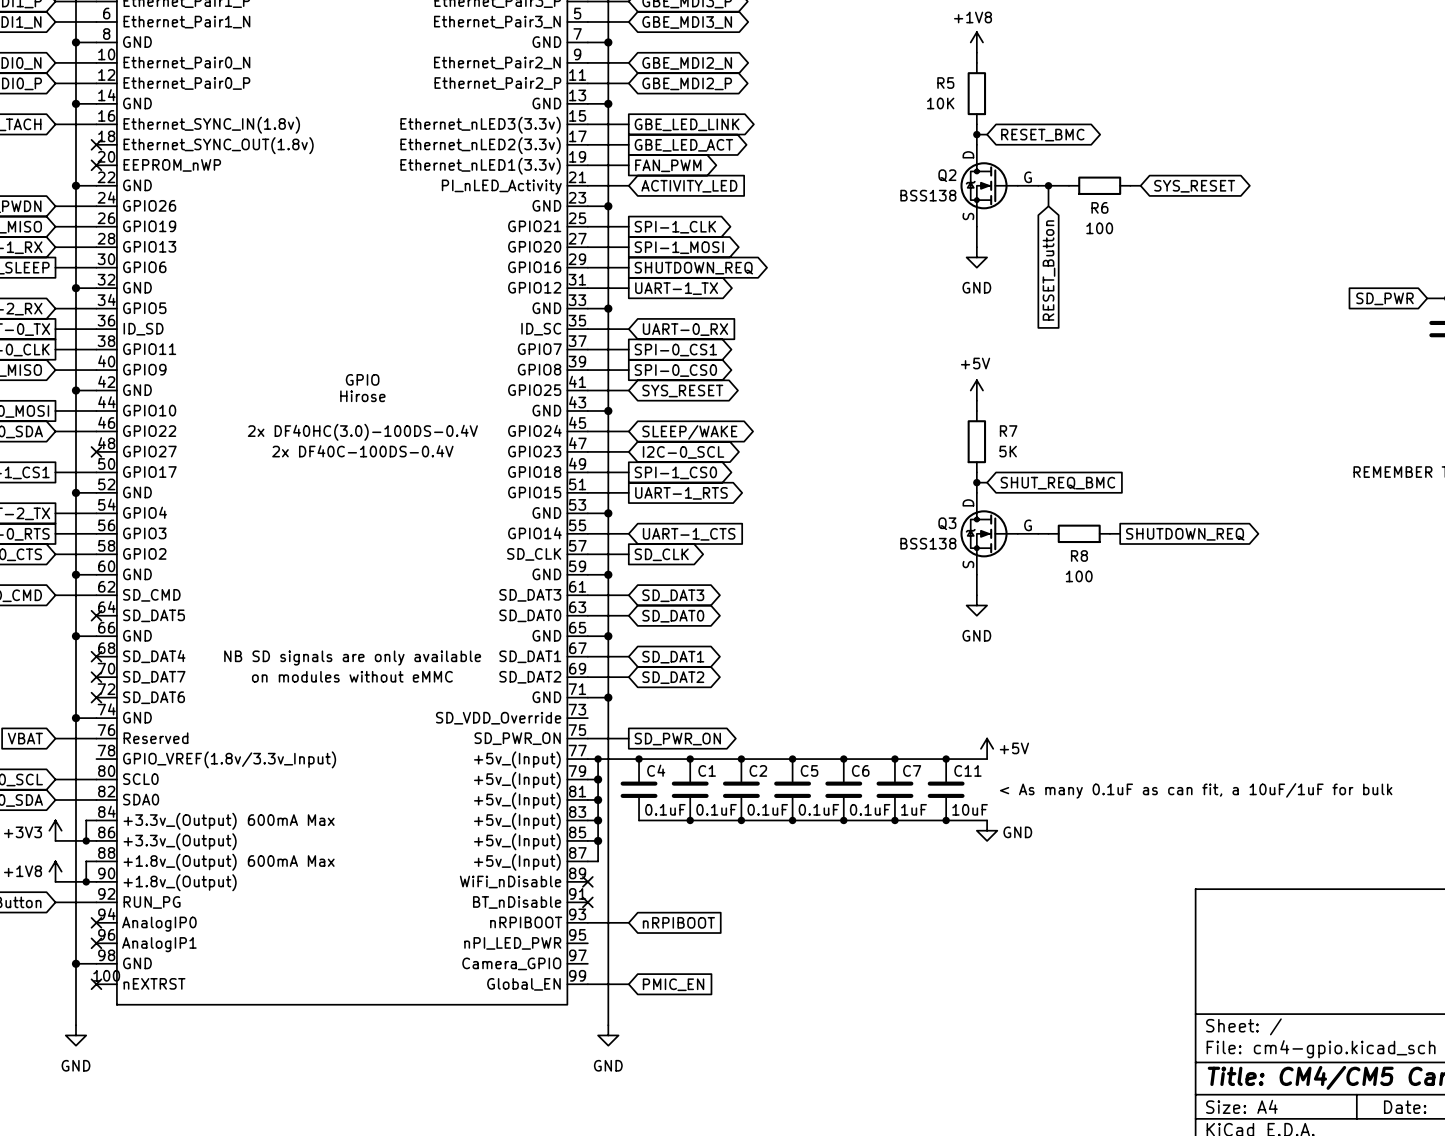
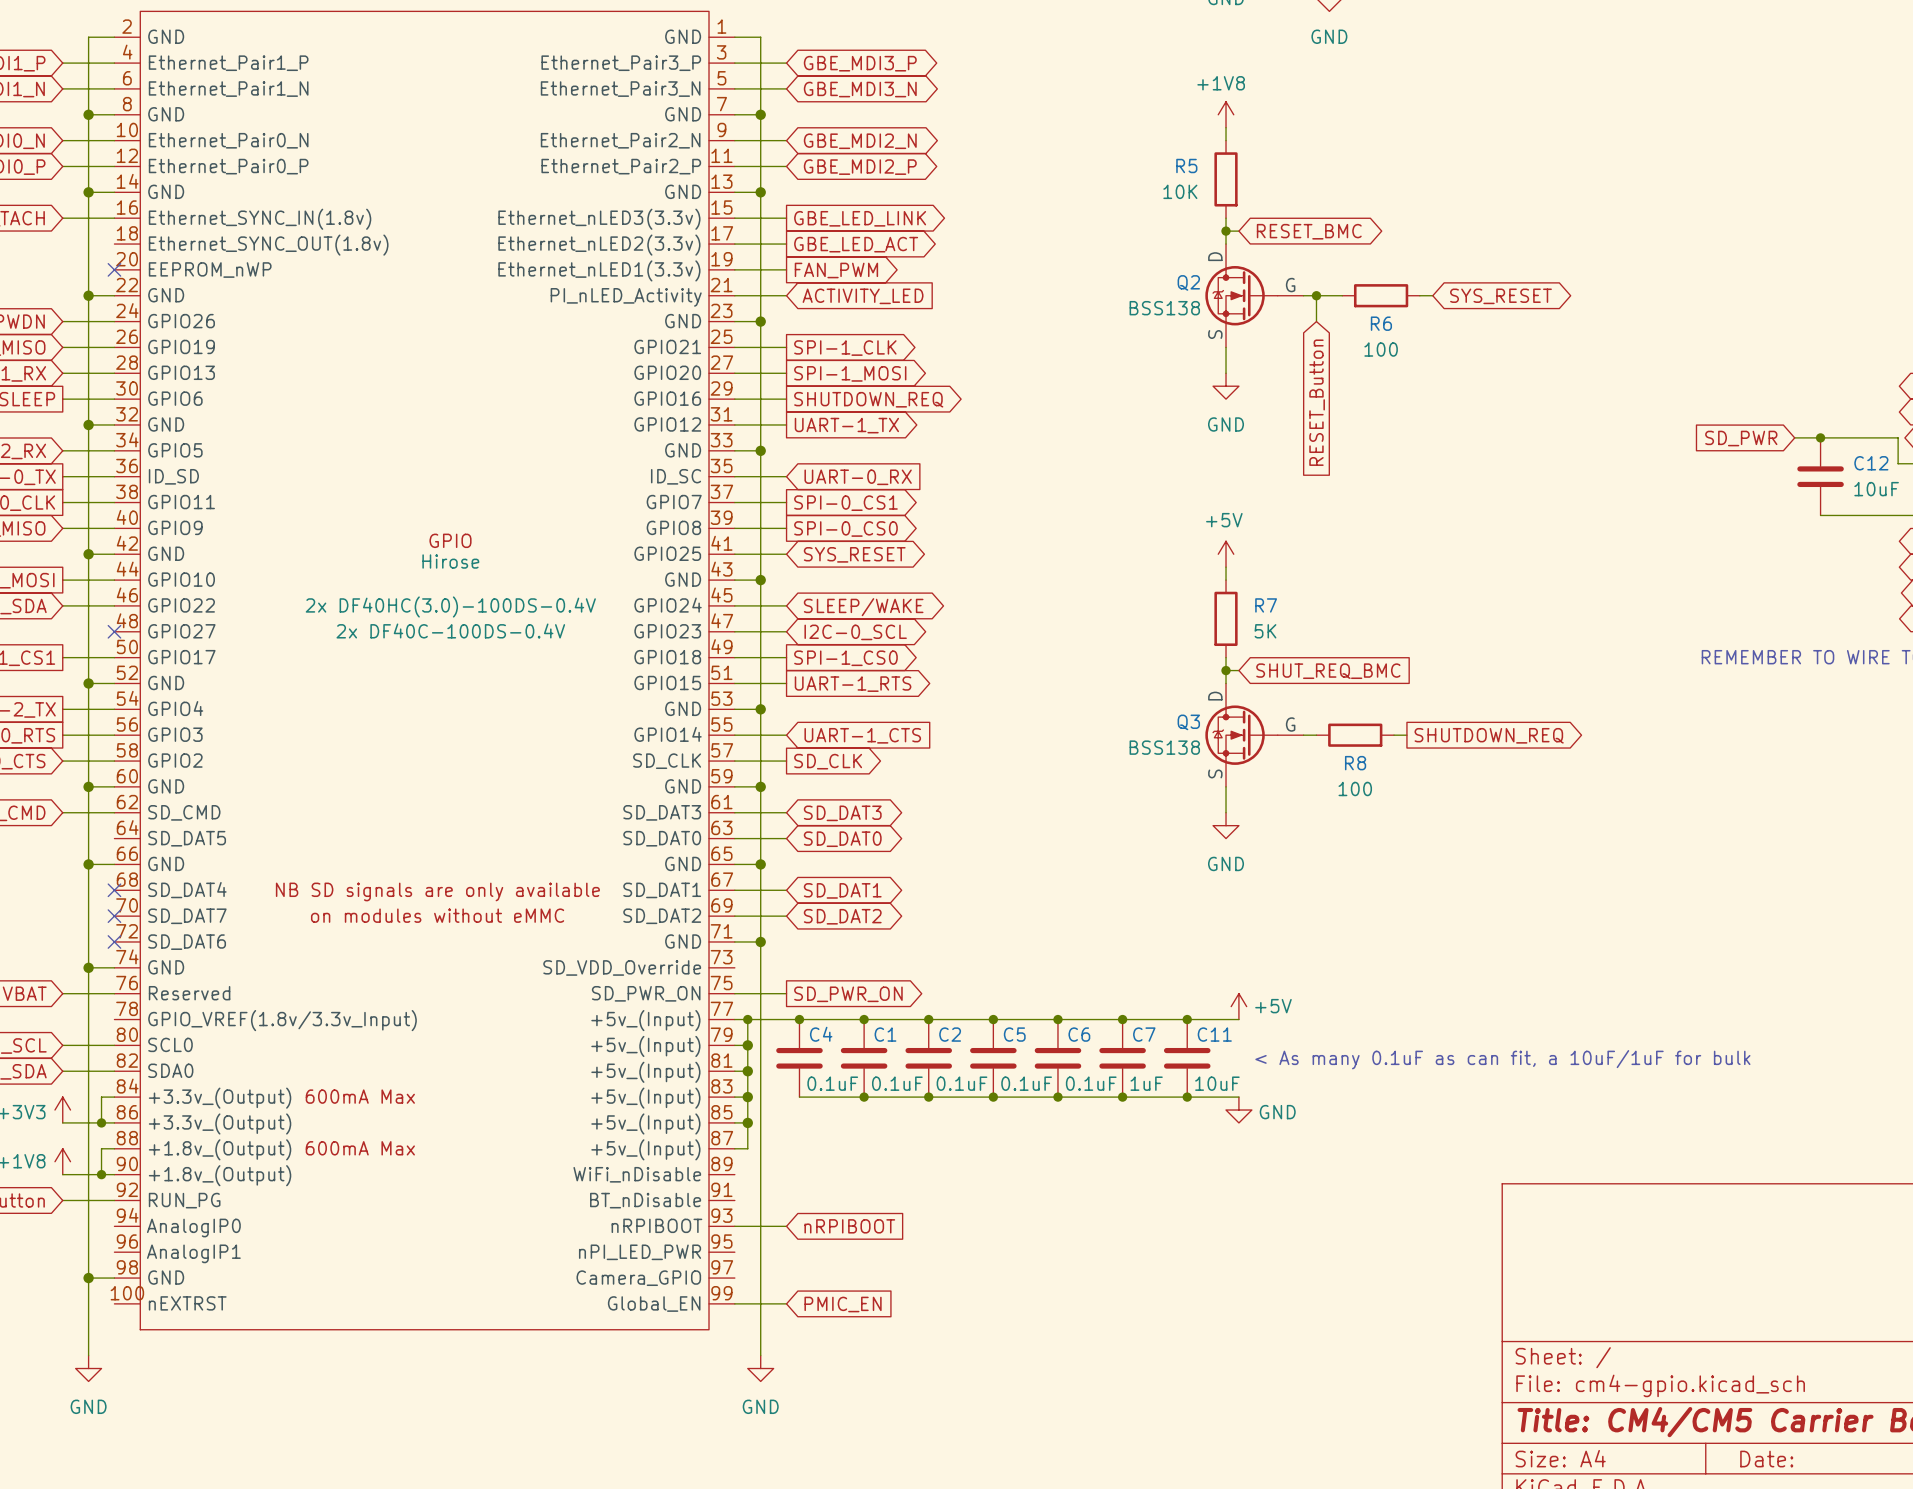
no-connect mark: (96, 144) -> none
no-connect mark: (96, 615) -> none
no-connect mark: (587, 881) -> none
no-connect mark: (587, 902) -> none
no-connect mark: (96, 922) -> none
no-connect mark: (96, 943) -> none
no-connect mark: (96, 984) -> none

